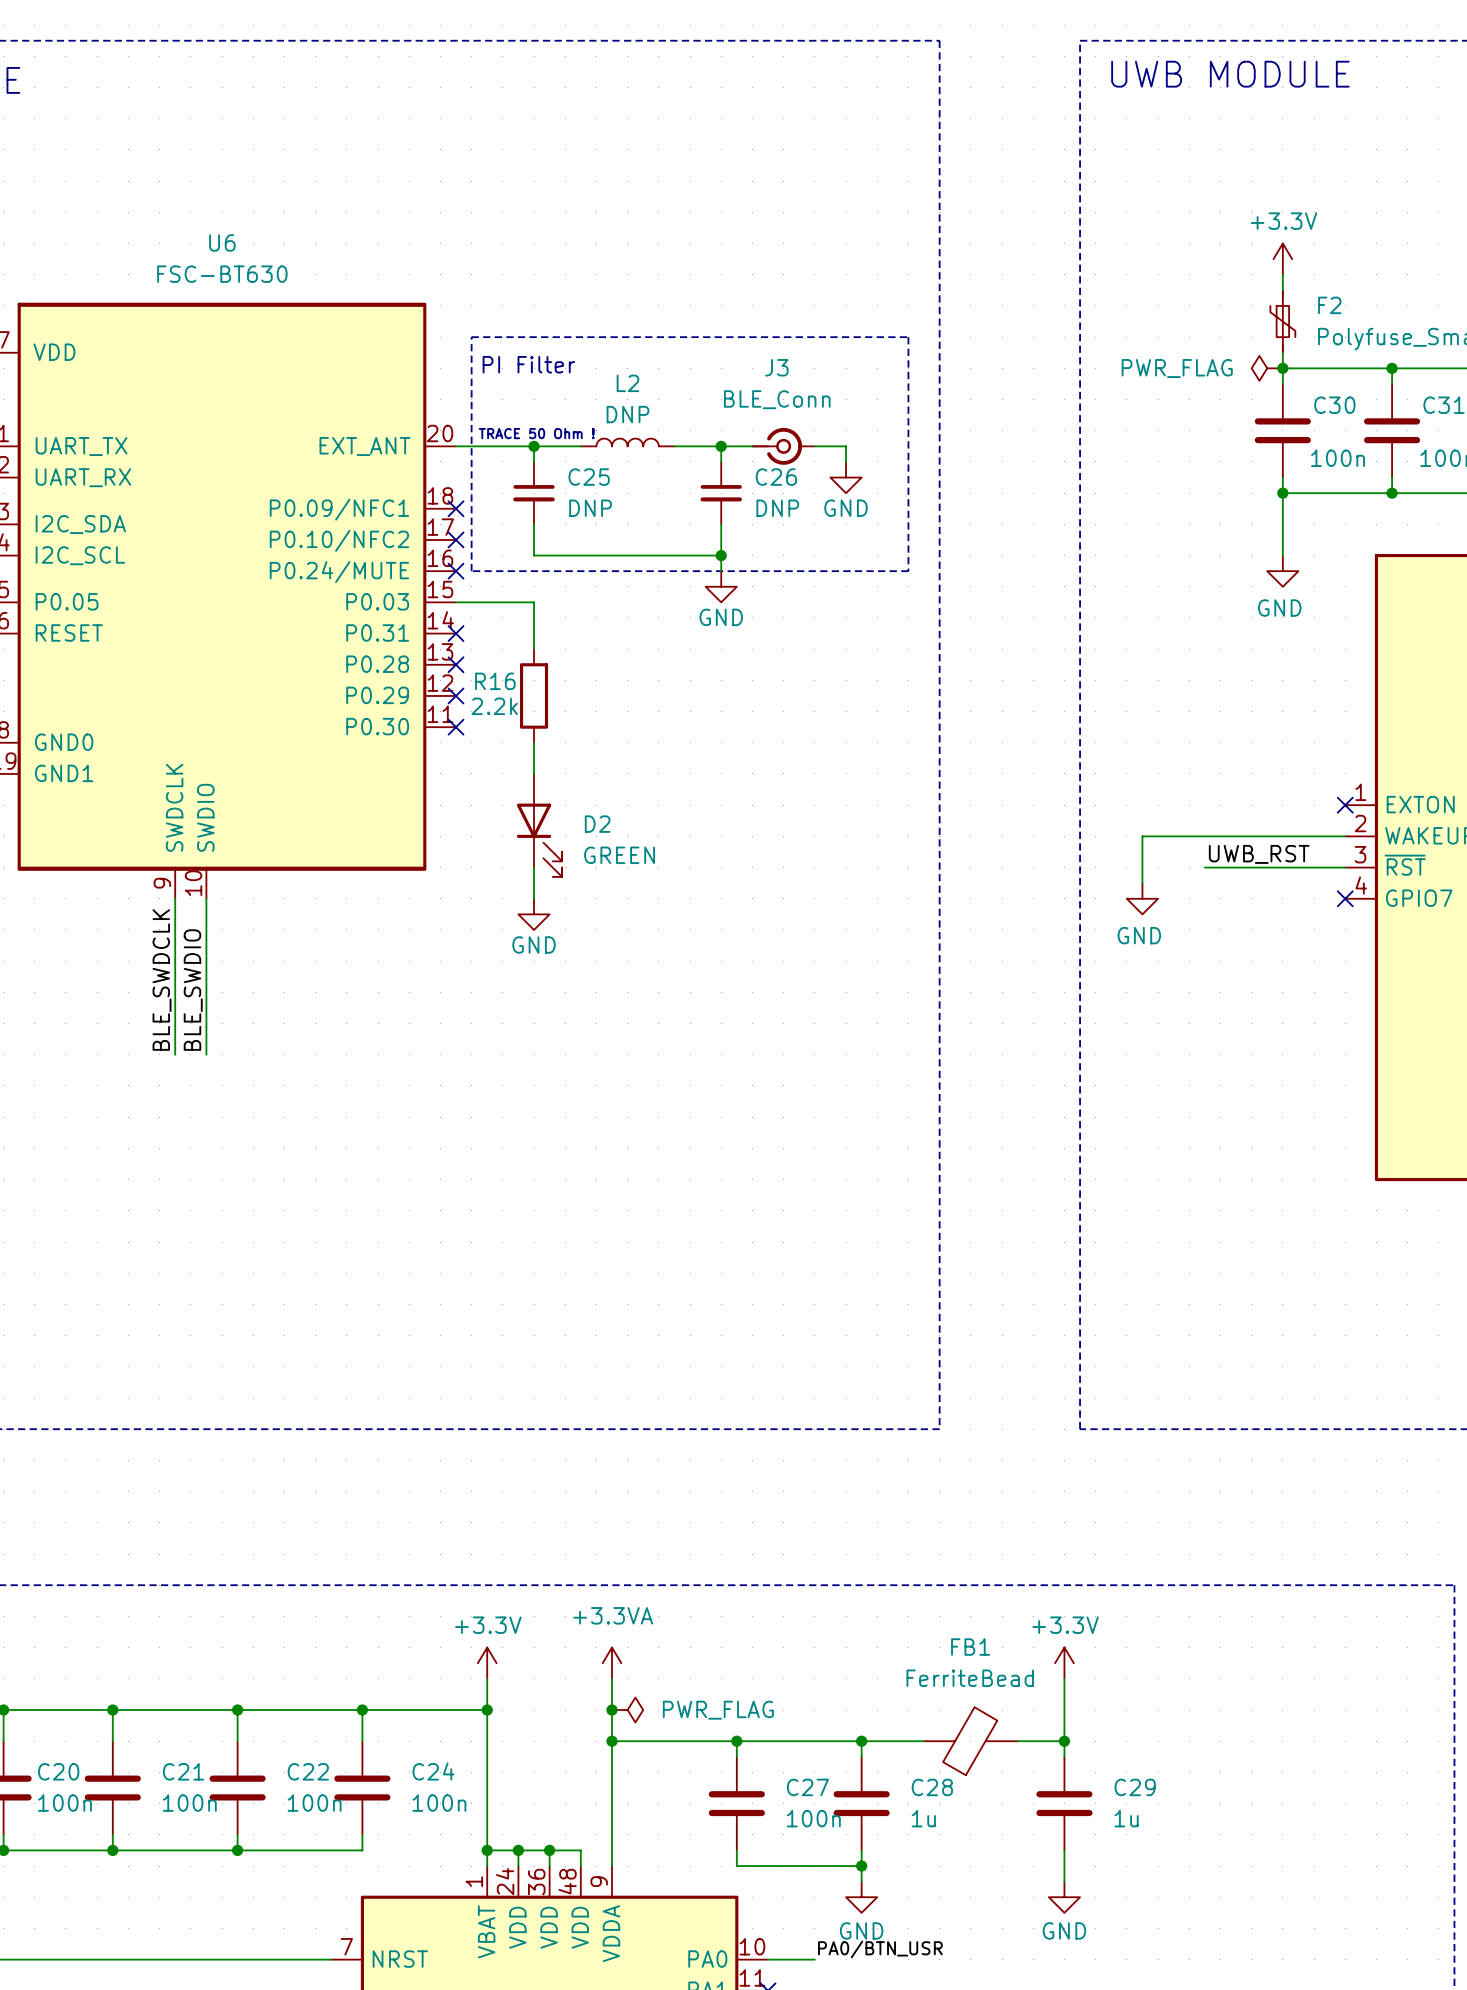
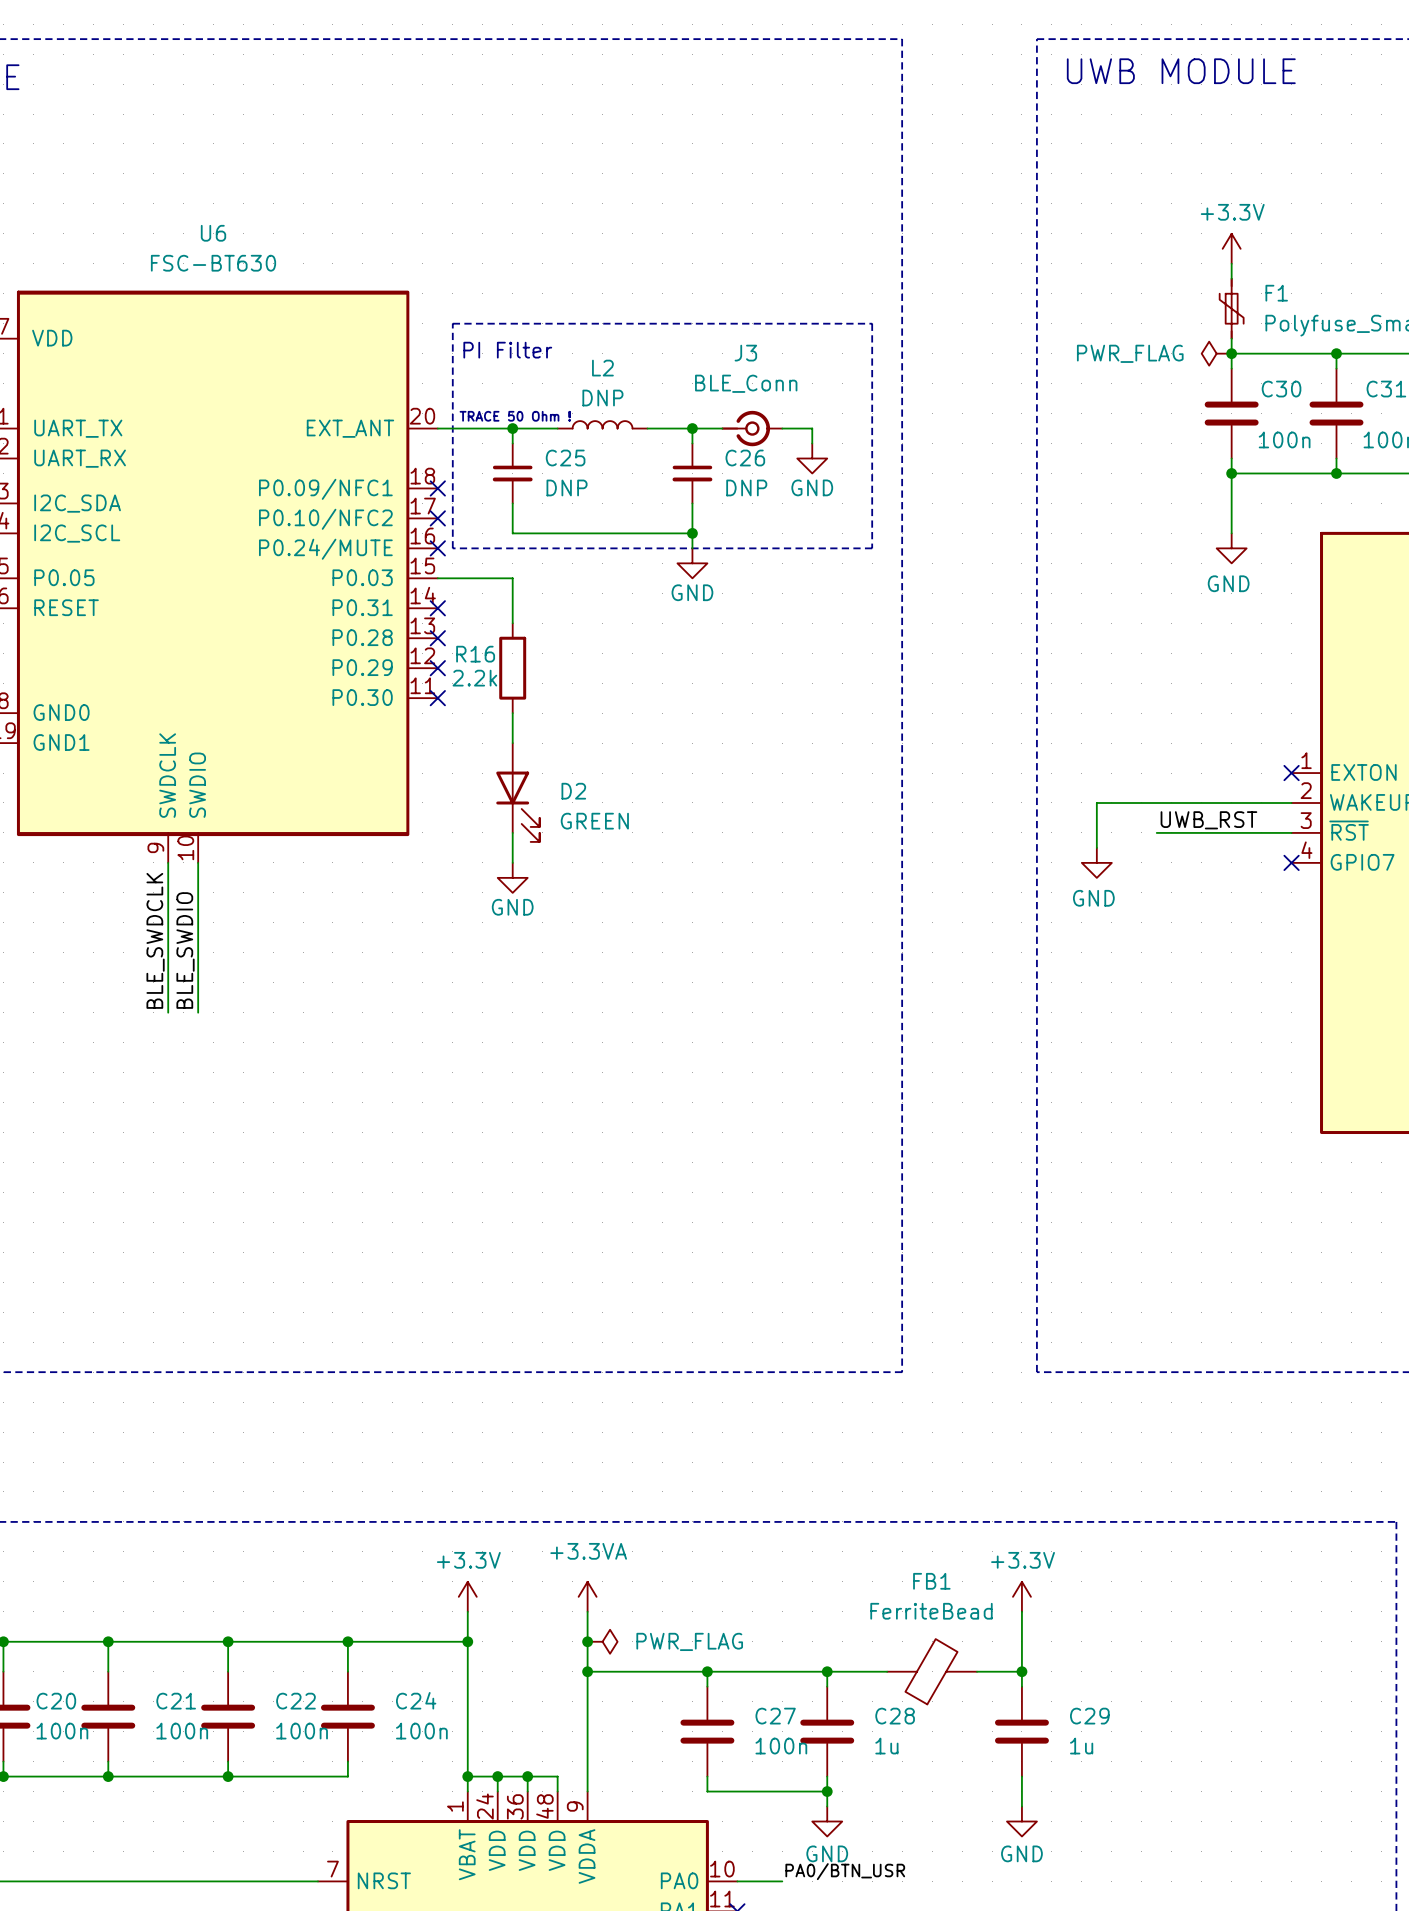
F2 name: F2 (1329, 305) -> F1 (1276, 293)

